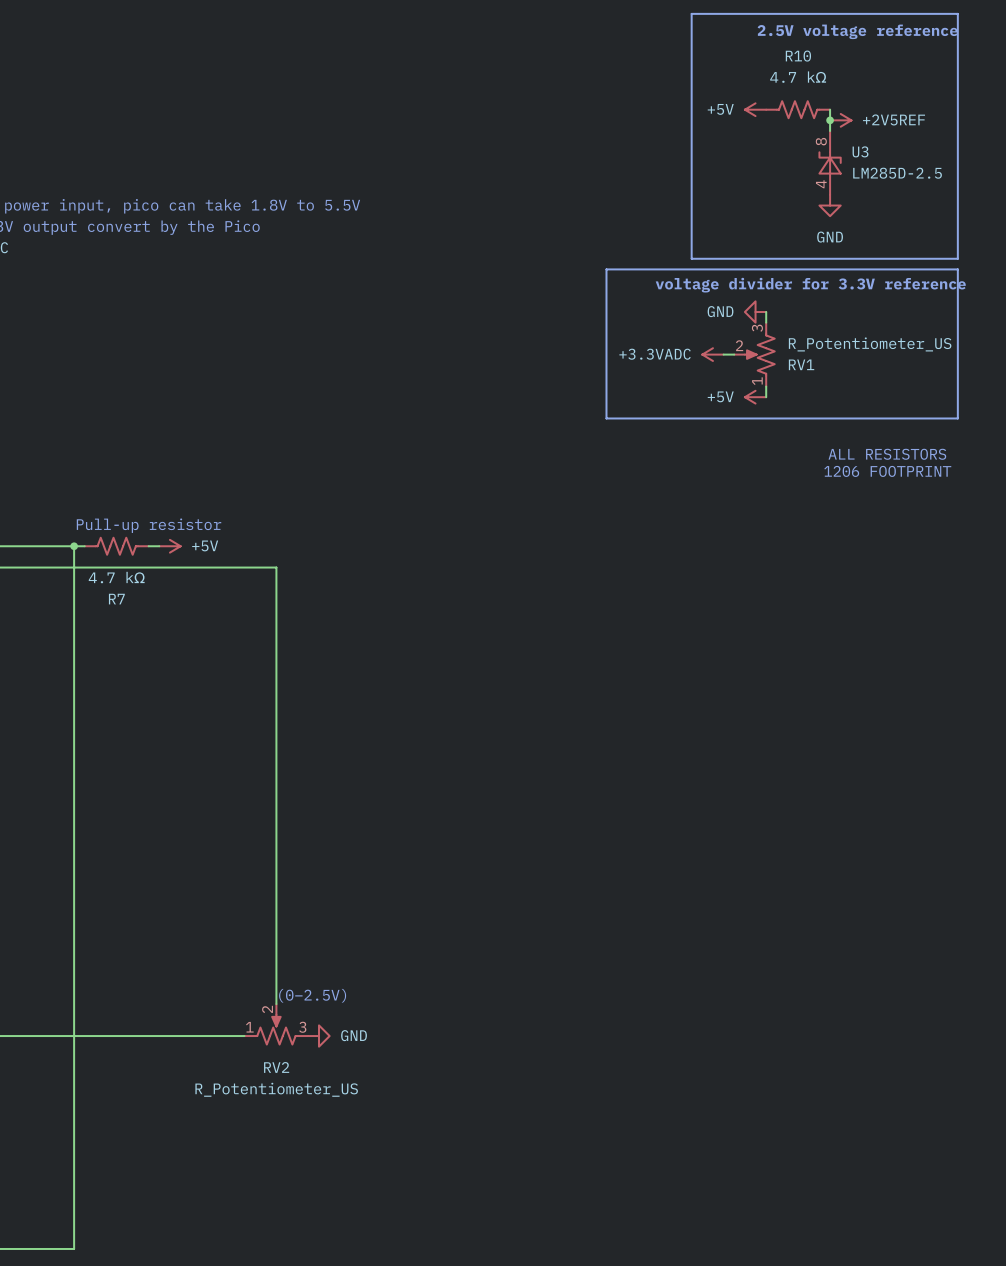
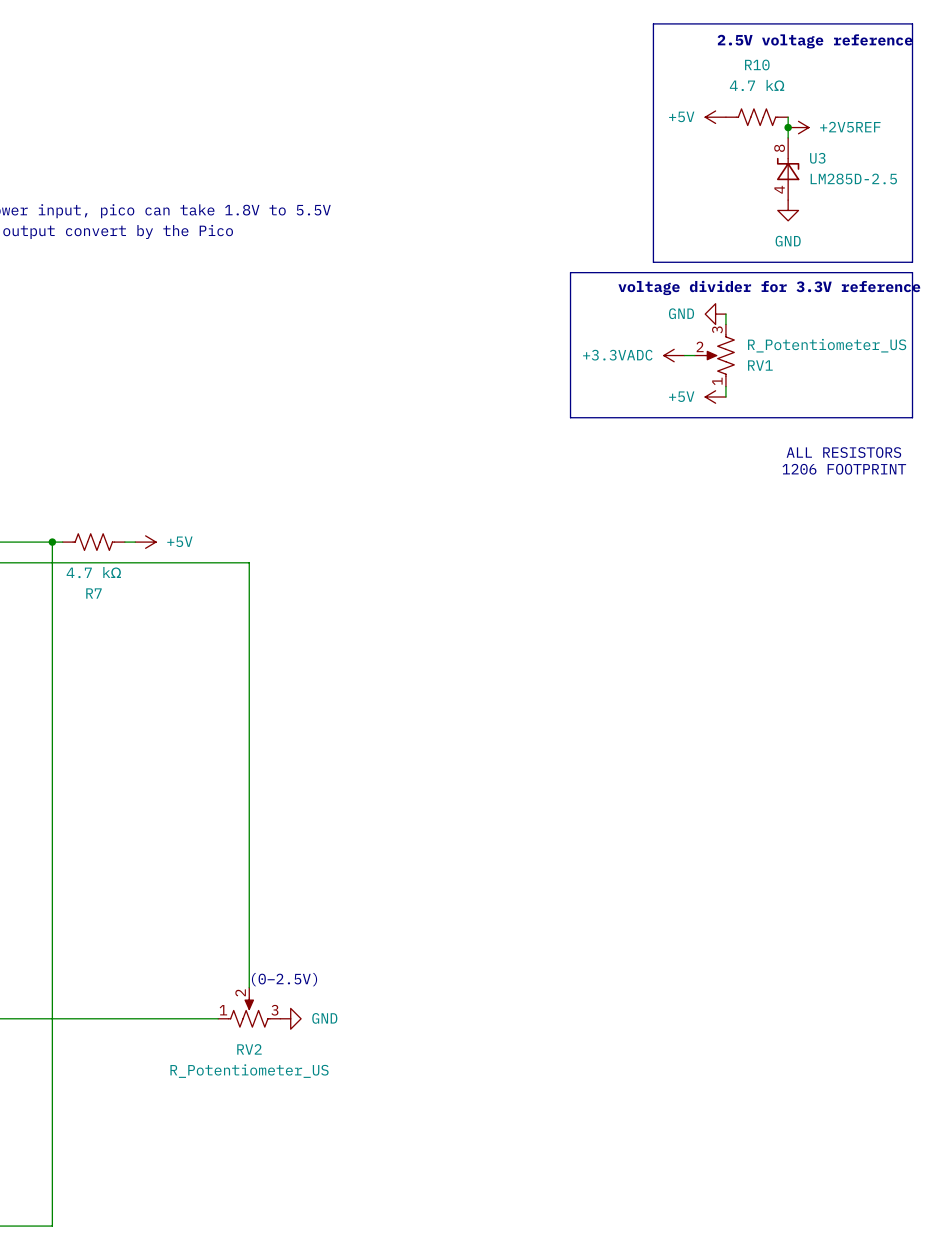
text: Pull-up resistor (149, 525) -> none

